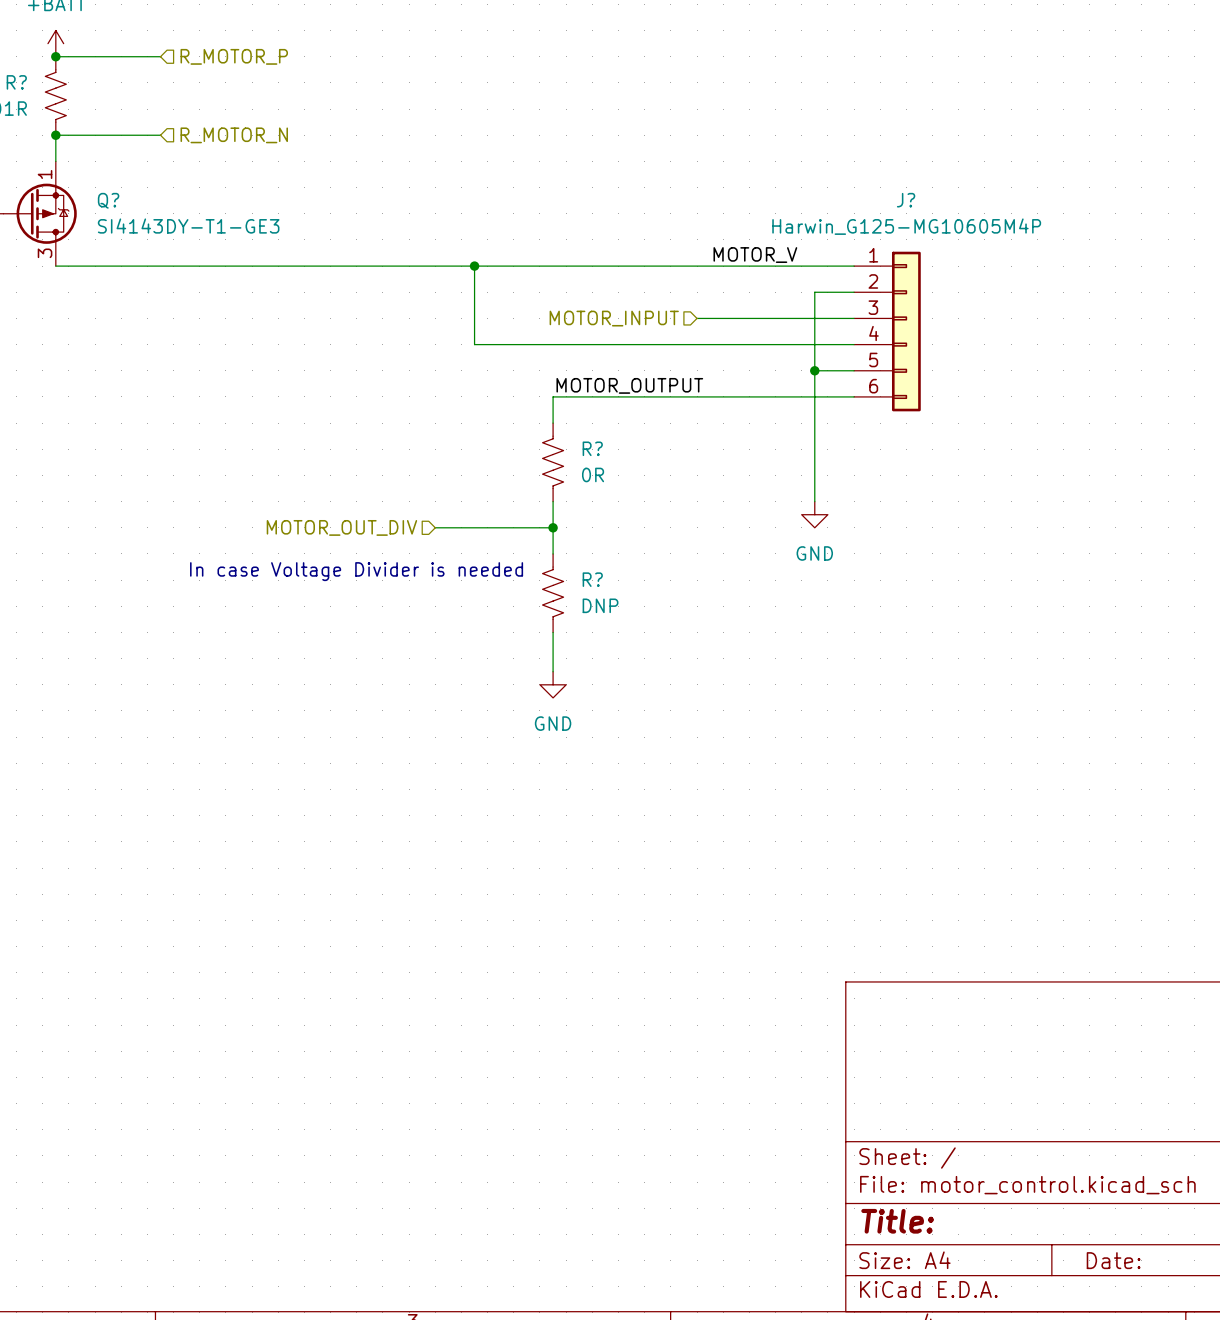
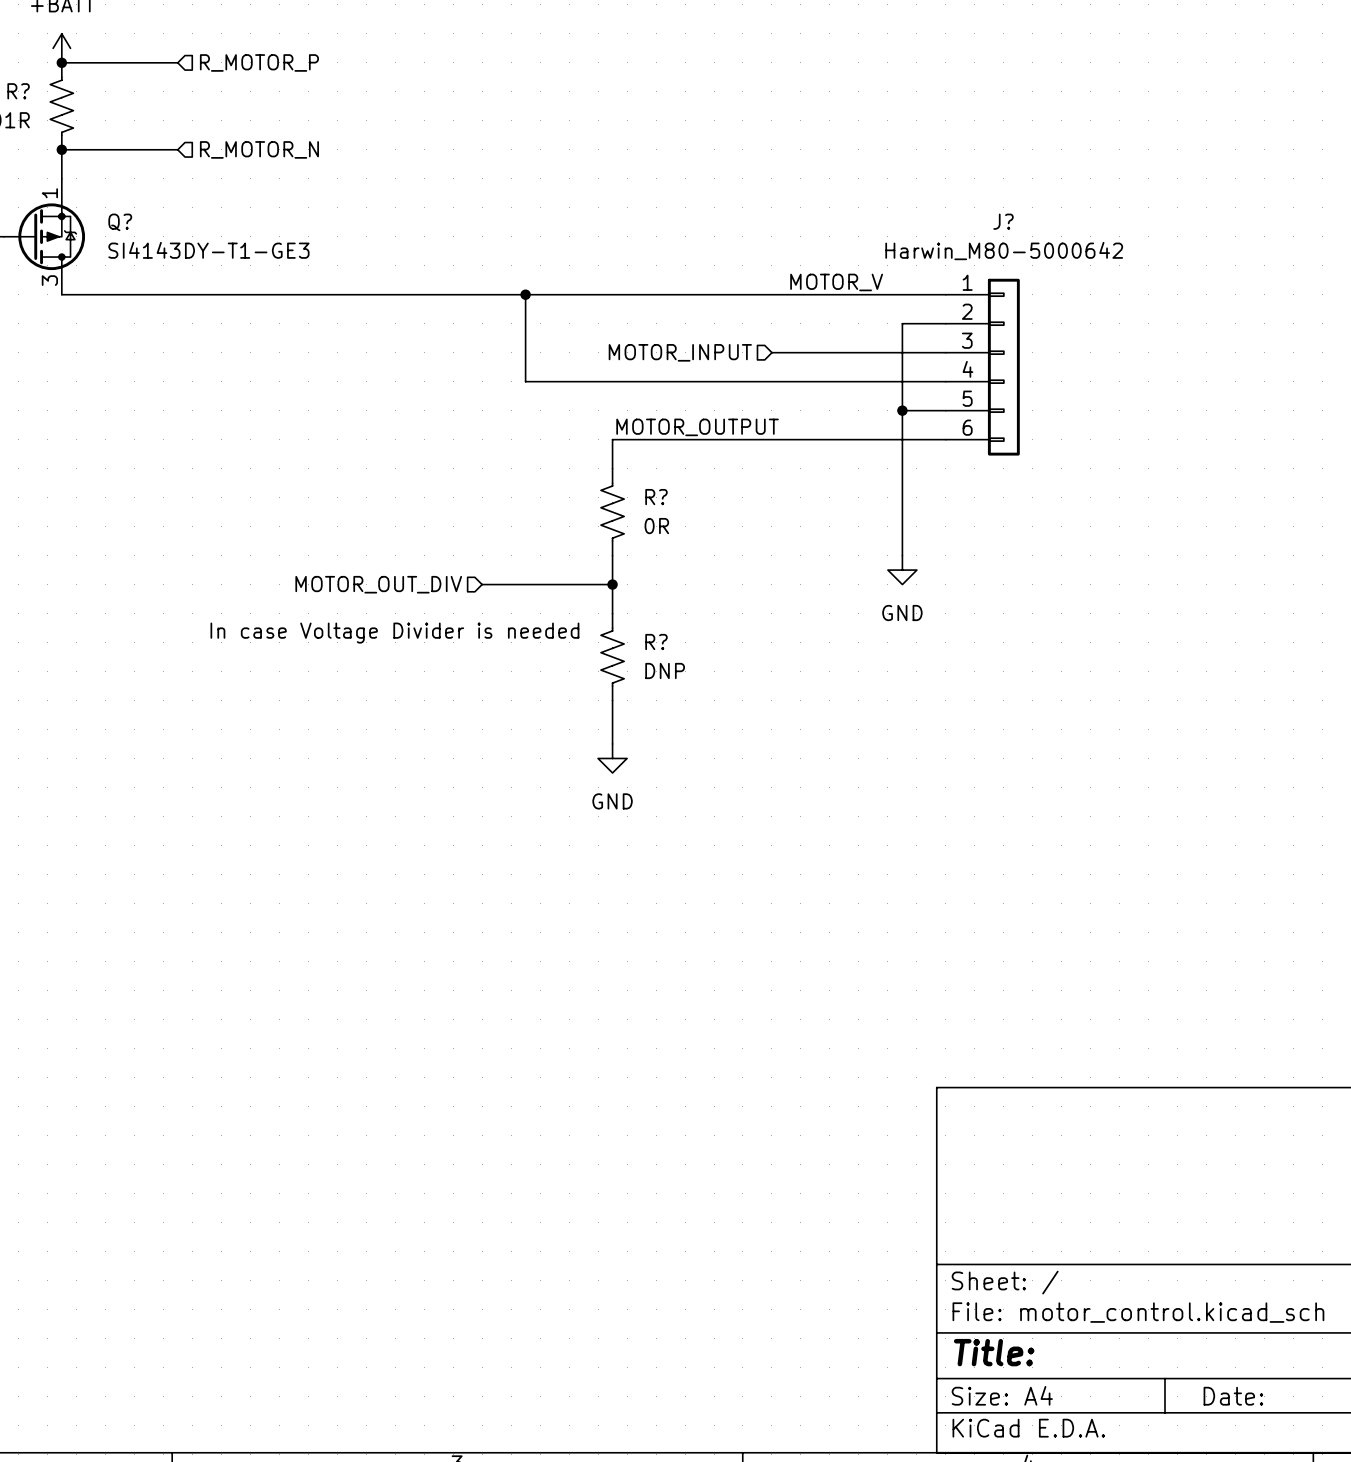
J? value: Harwin_G125-MG10605M4P (906, 226) -> Harwin_M80-5000642 (1004, 251)

